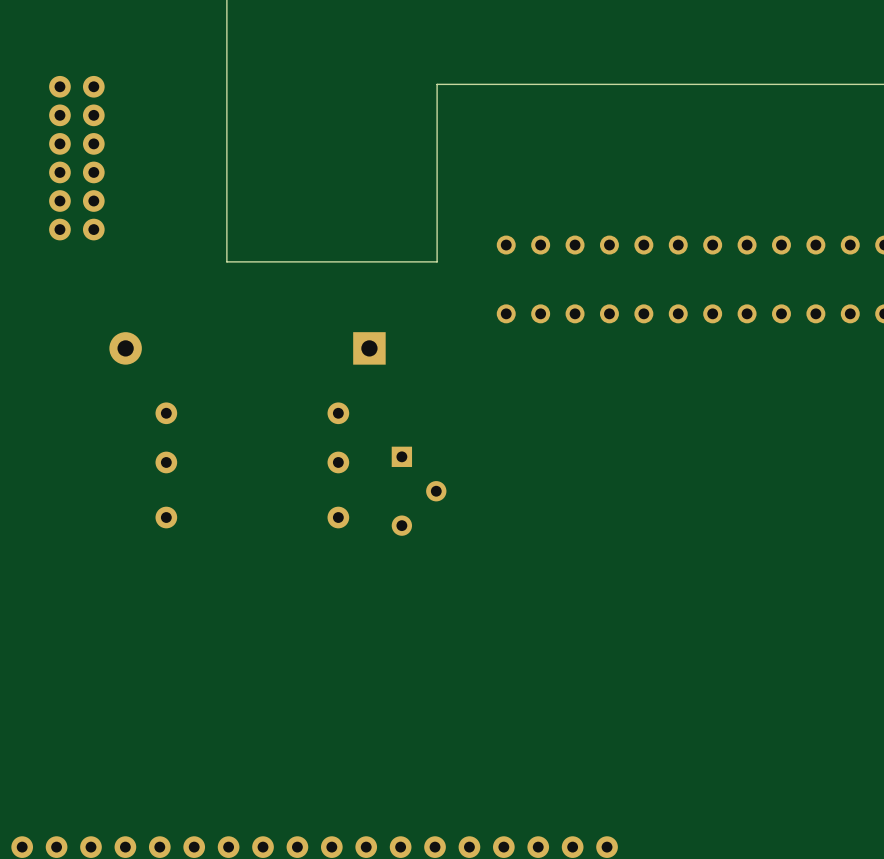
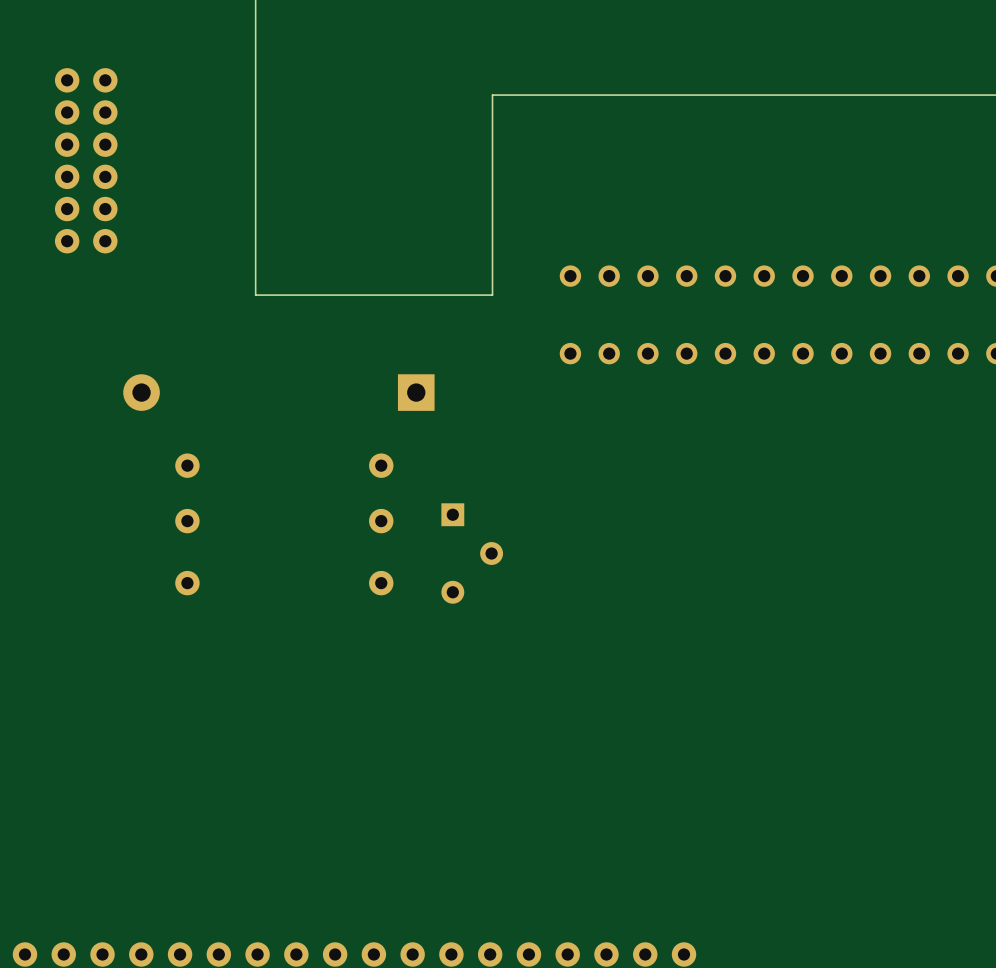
part: none -> (86, 80)
part: (76, 86) -> none
part: none -> (86, 112)
part: (76, 115) -> none
part: none -> (86, 144)
part: (76, 143) -> none
part: none -> (86, 176)
part: (76, 172) -> none
part: none -> (86, 209)
part: (76, 201) -> none
part: none -> (86, 241)
part: (76, 229) -> none

